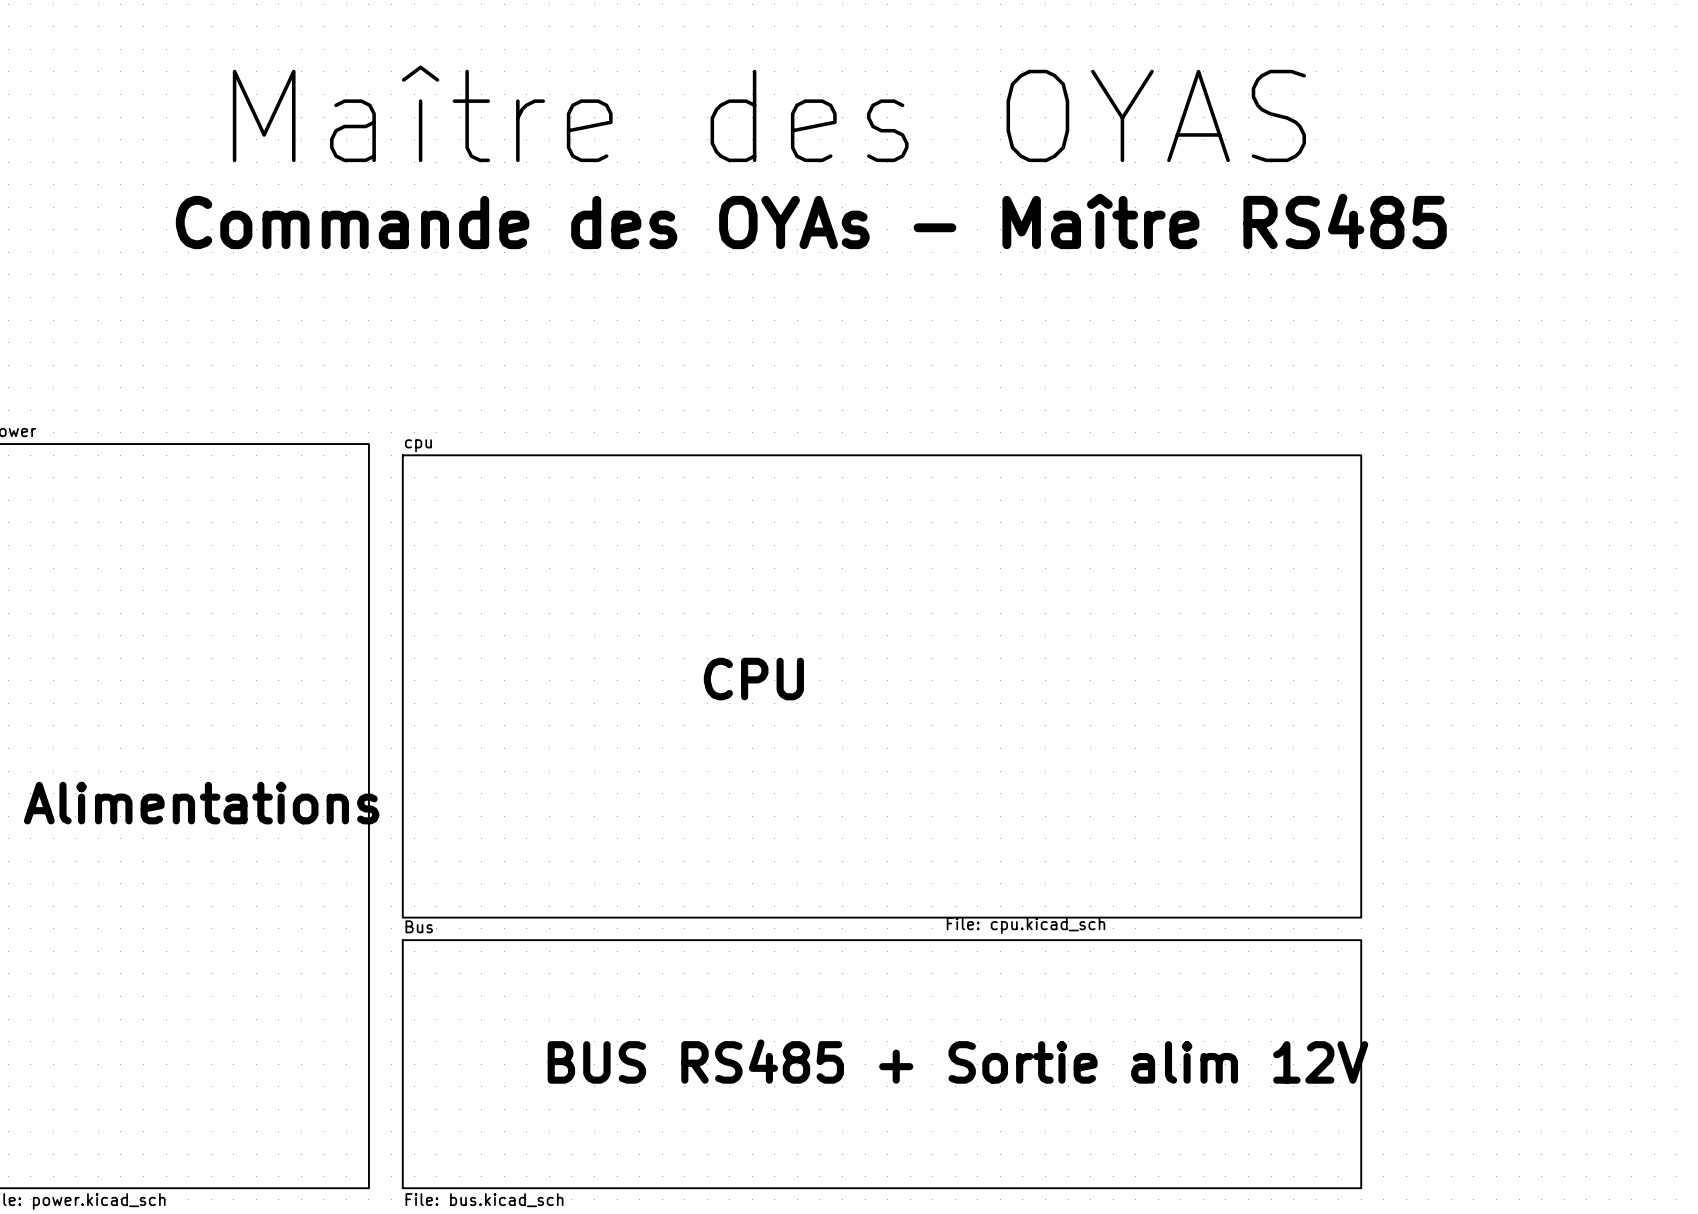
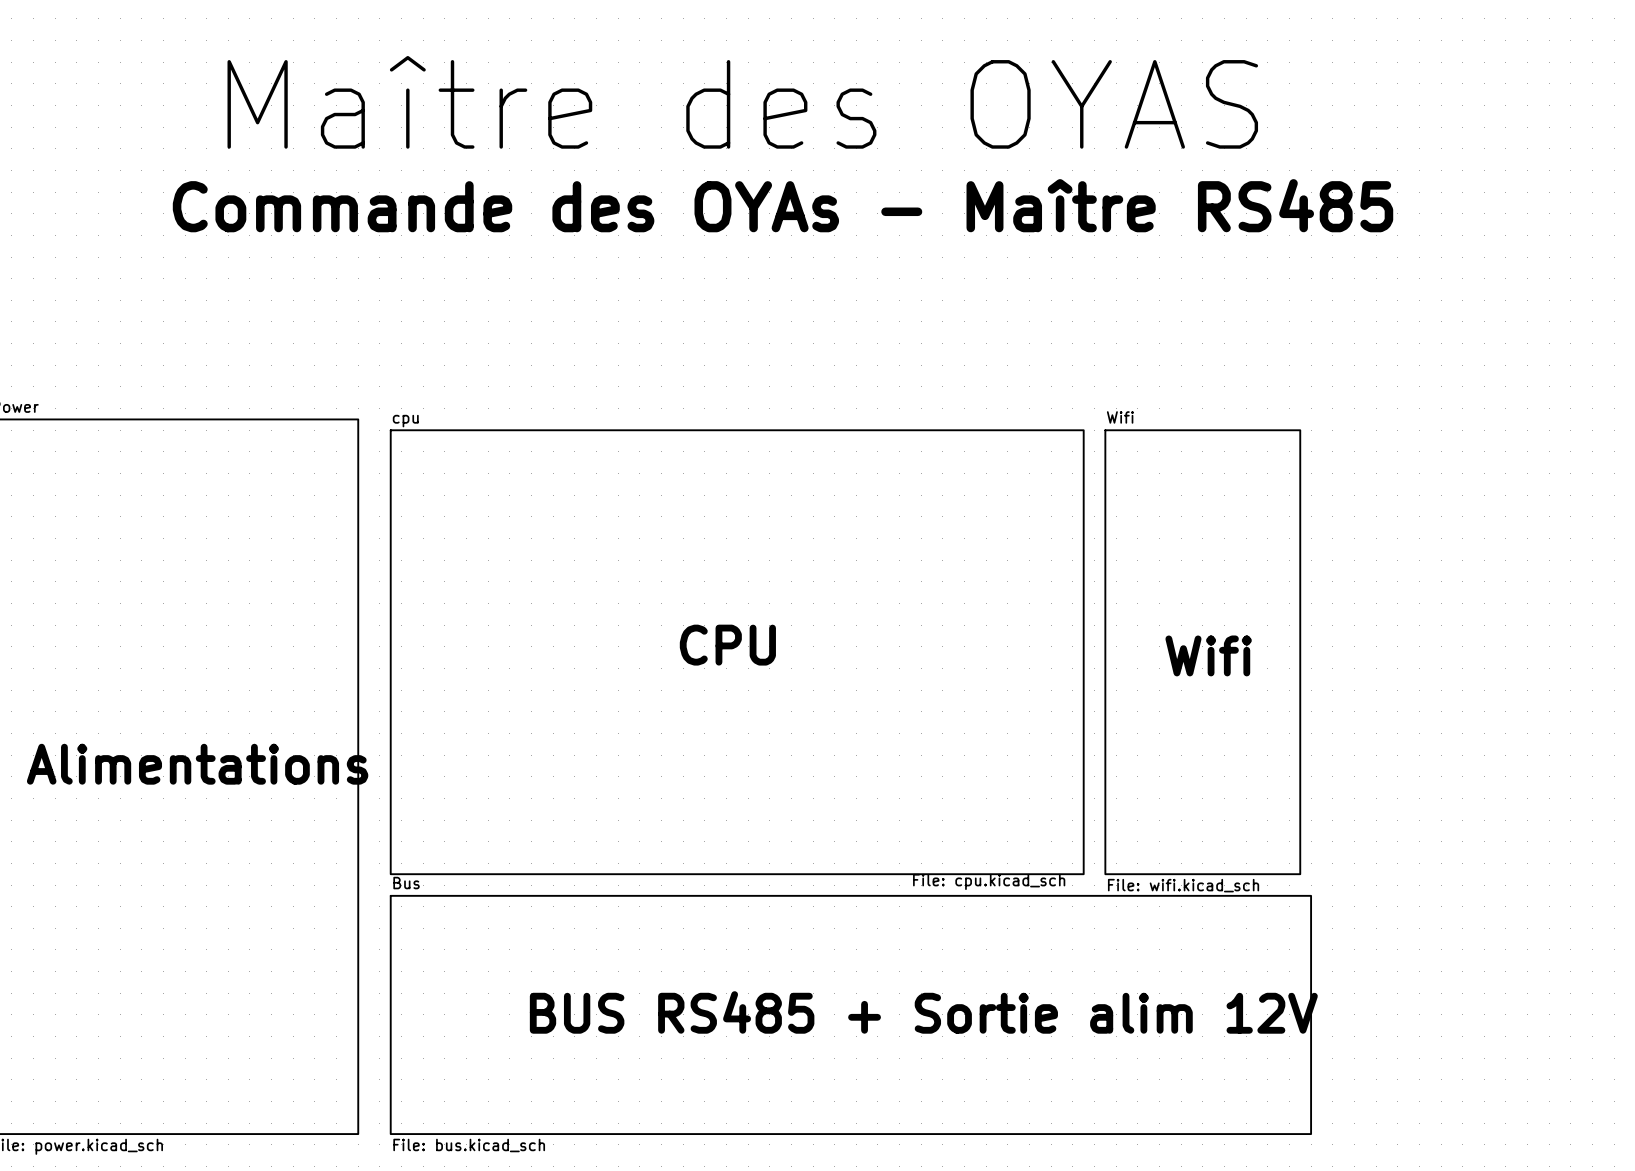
sheet cpu: none -> File: cpu.kicad_sch (737, 652)
sheet cpu: File: cpu.kicad_sch (882, 686) -> none
sheet Wifi: none -> File: wifi.kicad_sch (1202, 652)
text: none -> Wifi (1208, 655)

